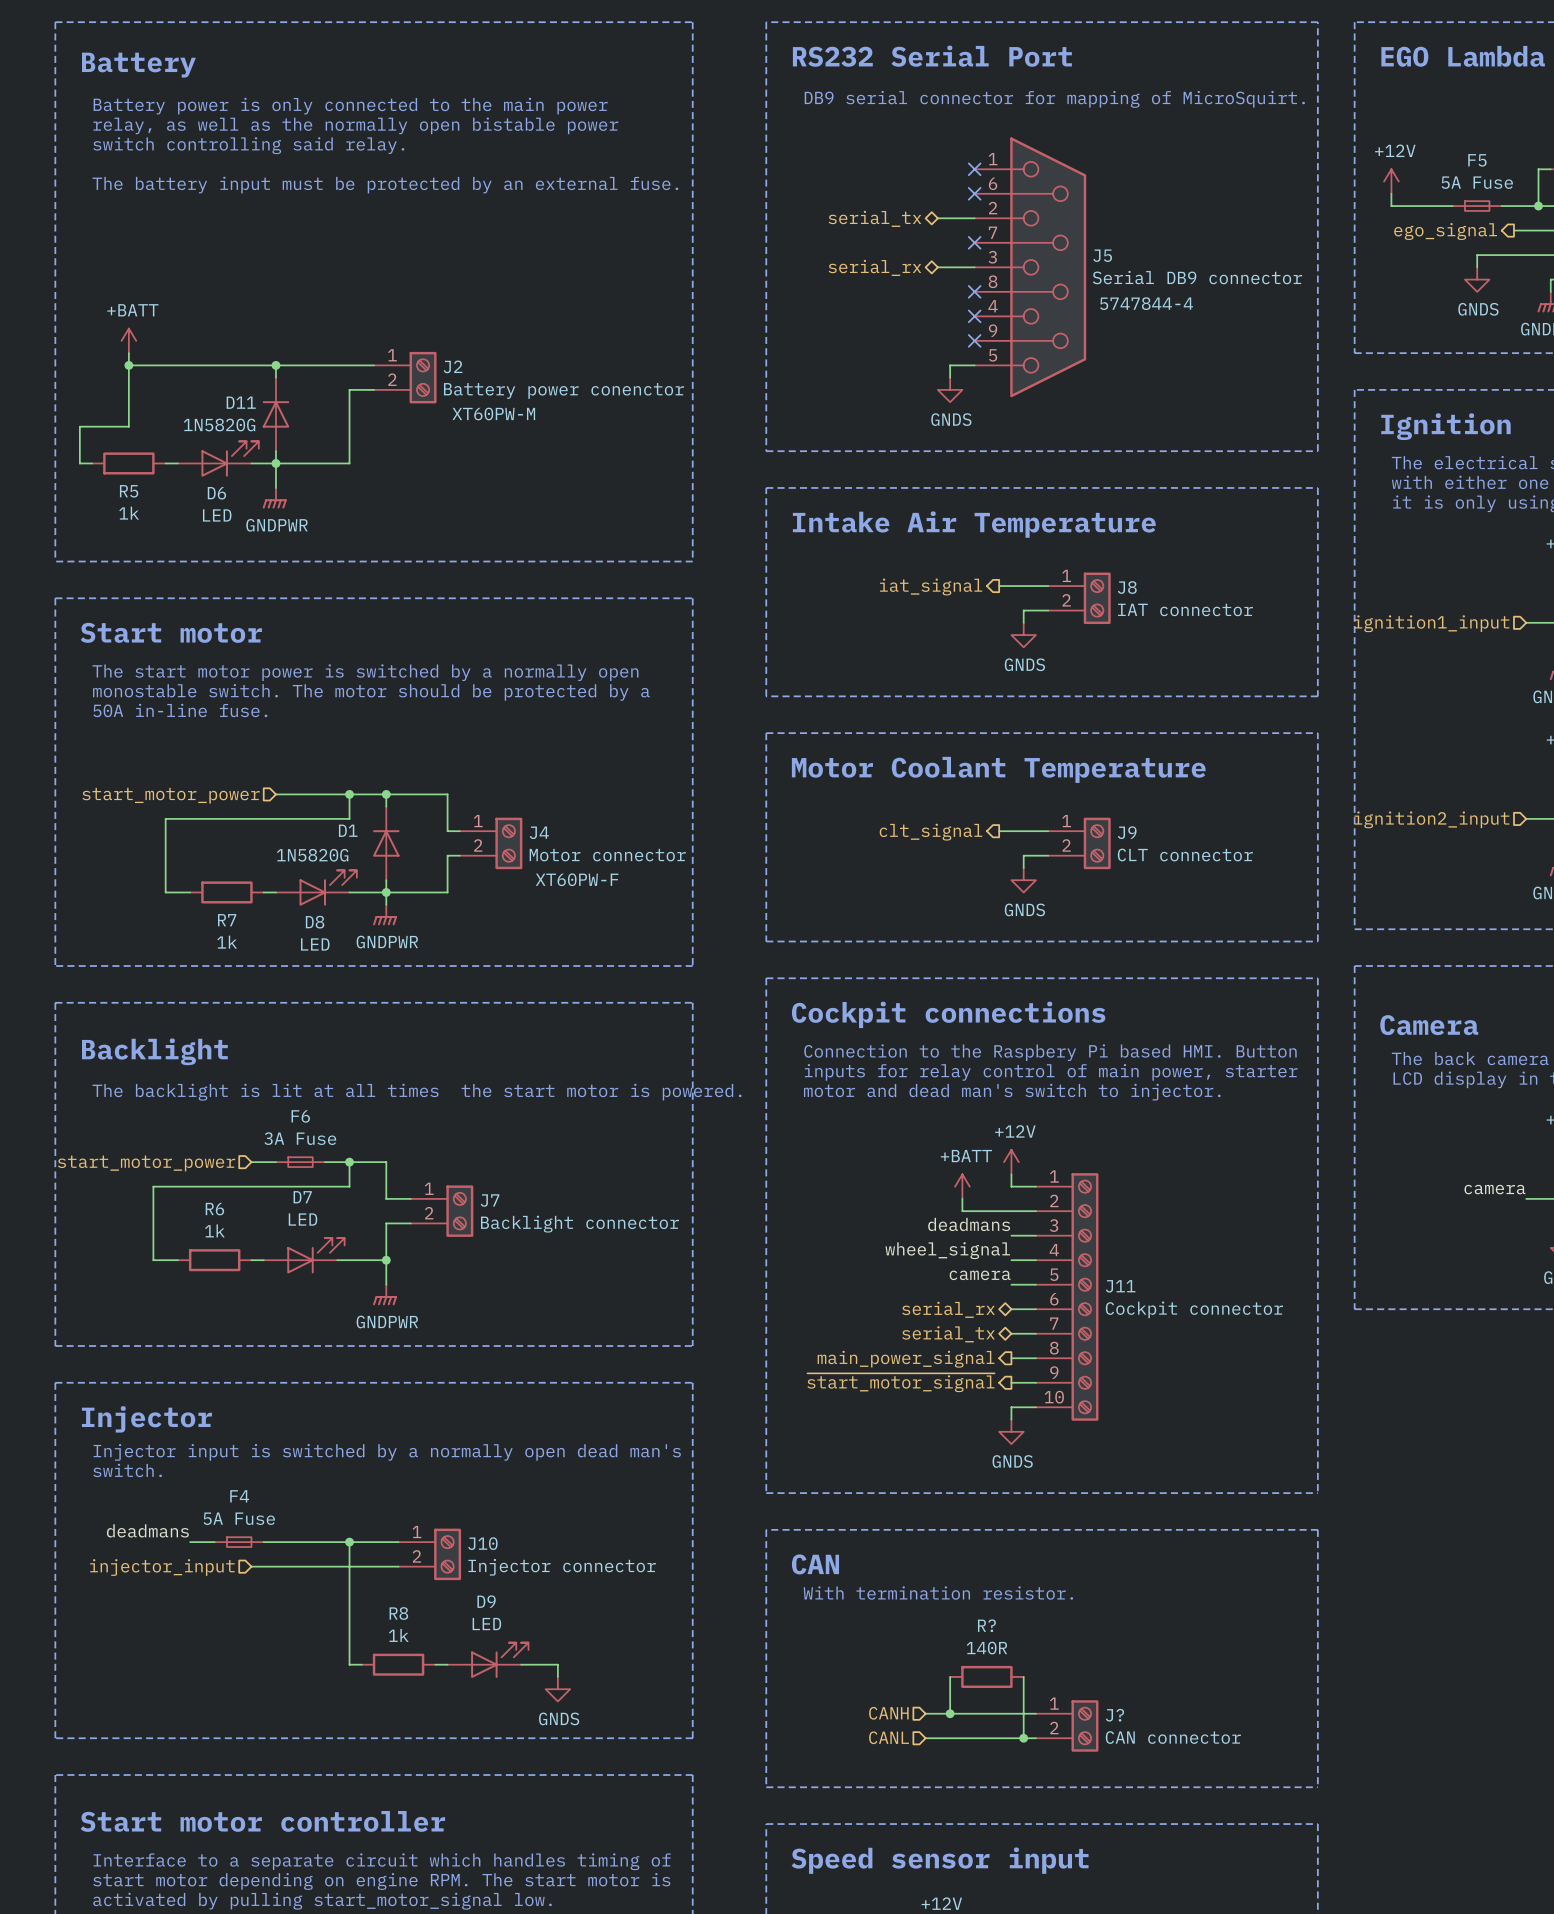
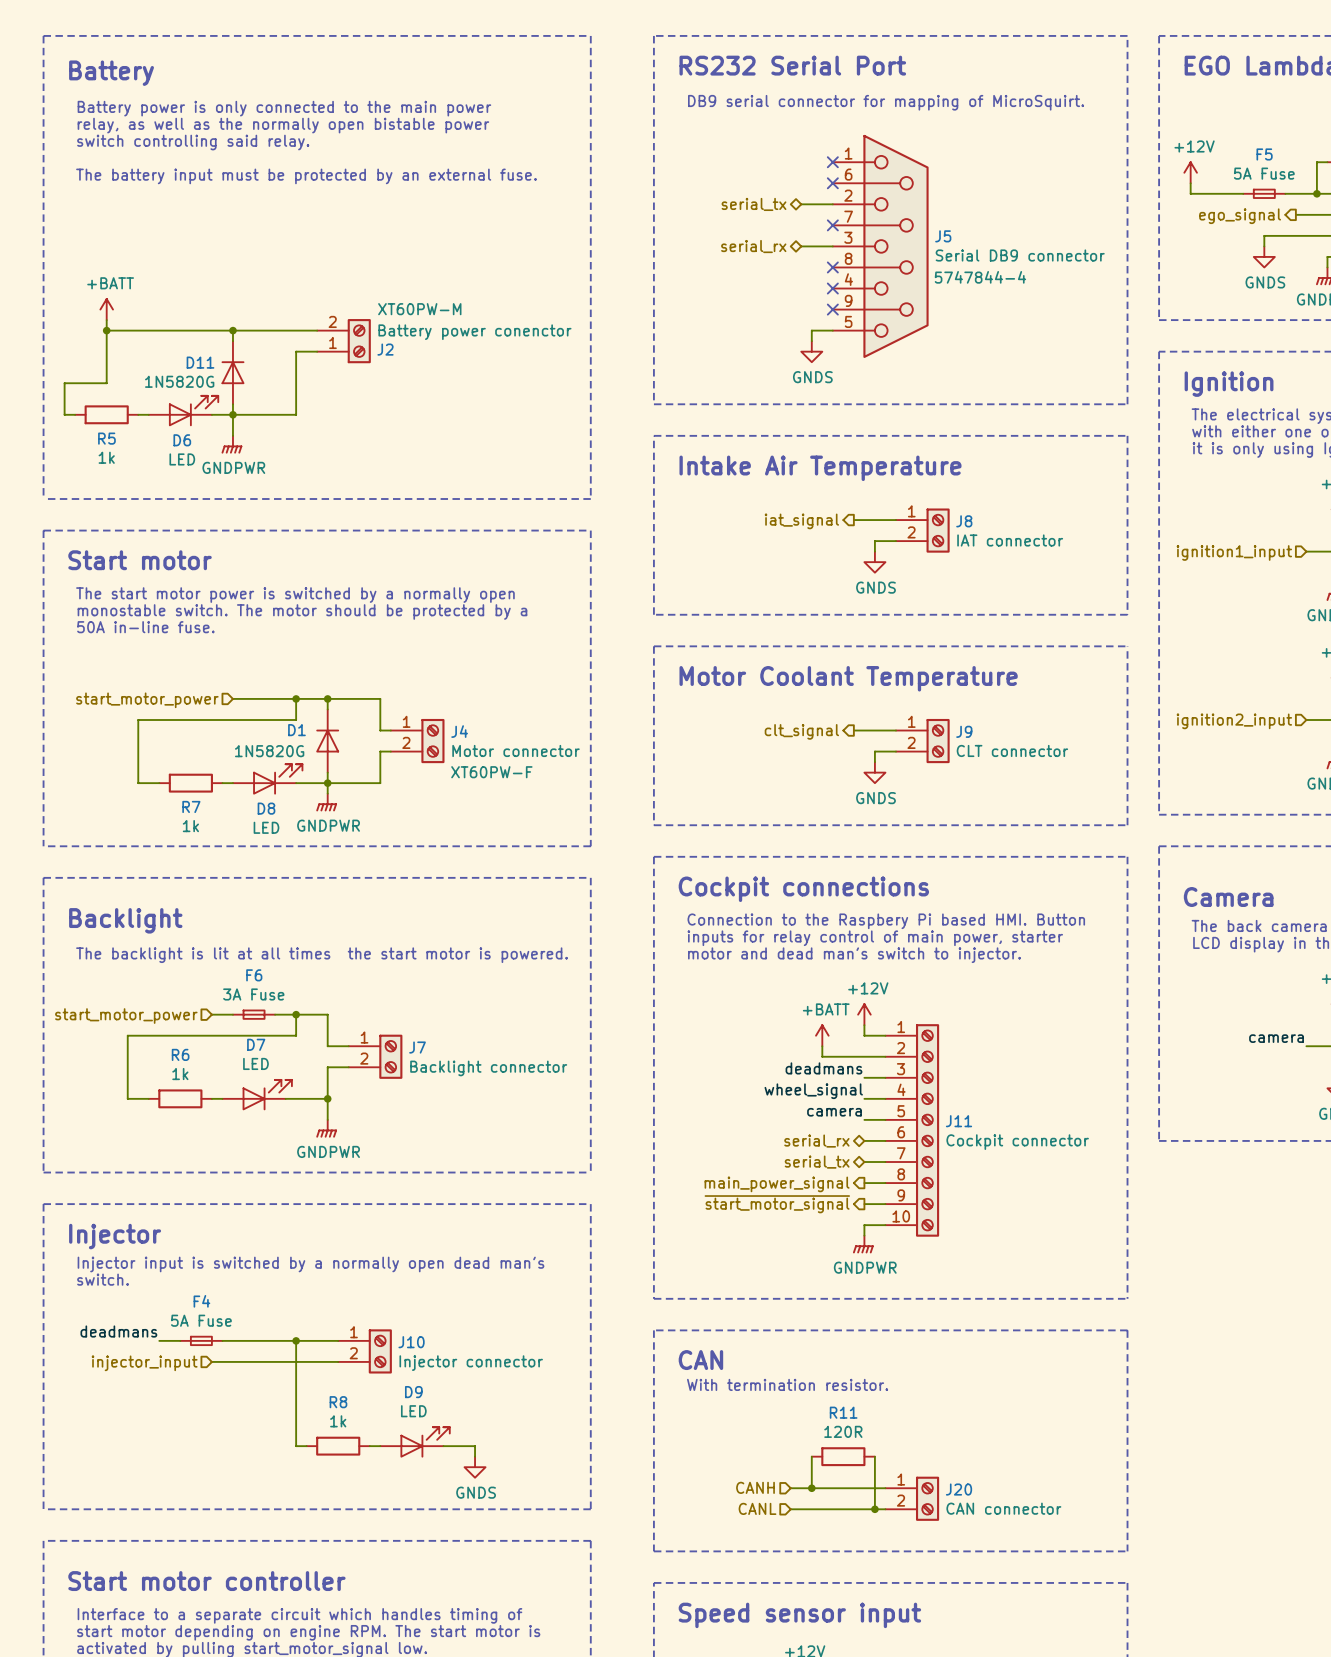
J2 flip: as is (423, 377) -> up-down (359, 341)
power symbol: GNDS (1011, 1431) -> GNDPWR (863, 1244)
R? name: R? (986, 1625) -> R11 (843, 1412)
R? value: 140R (986, 1648) -> 120R (843, 1431)
J? name: J? (1114, 1715) -> J20 (959, 1489)

